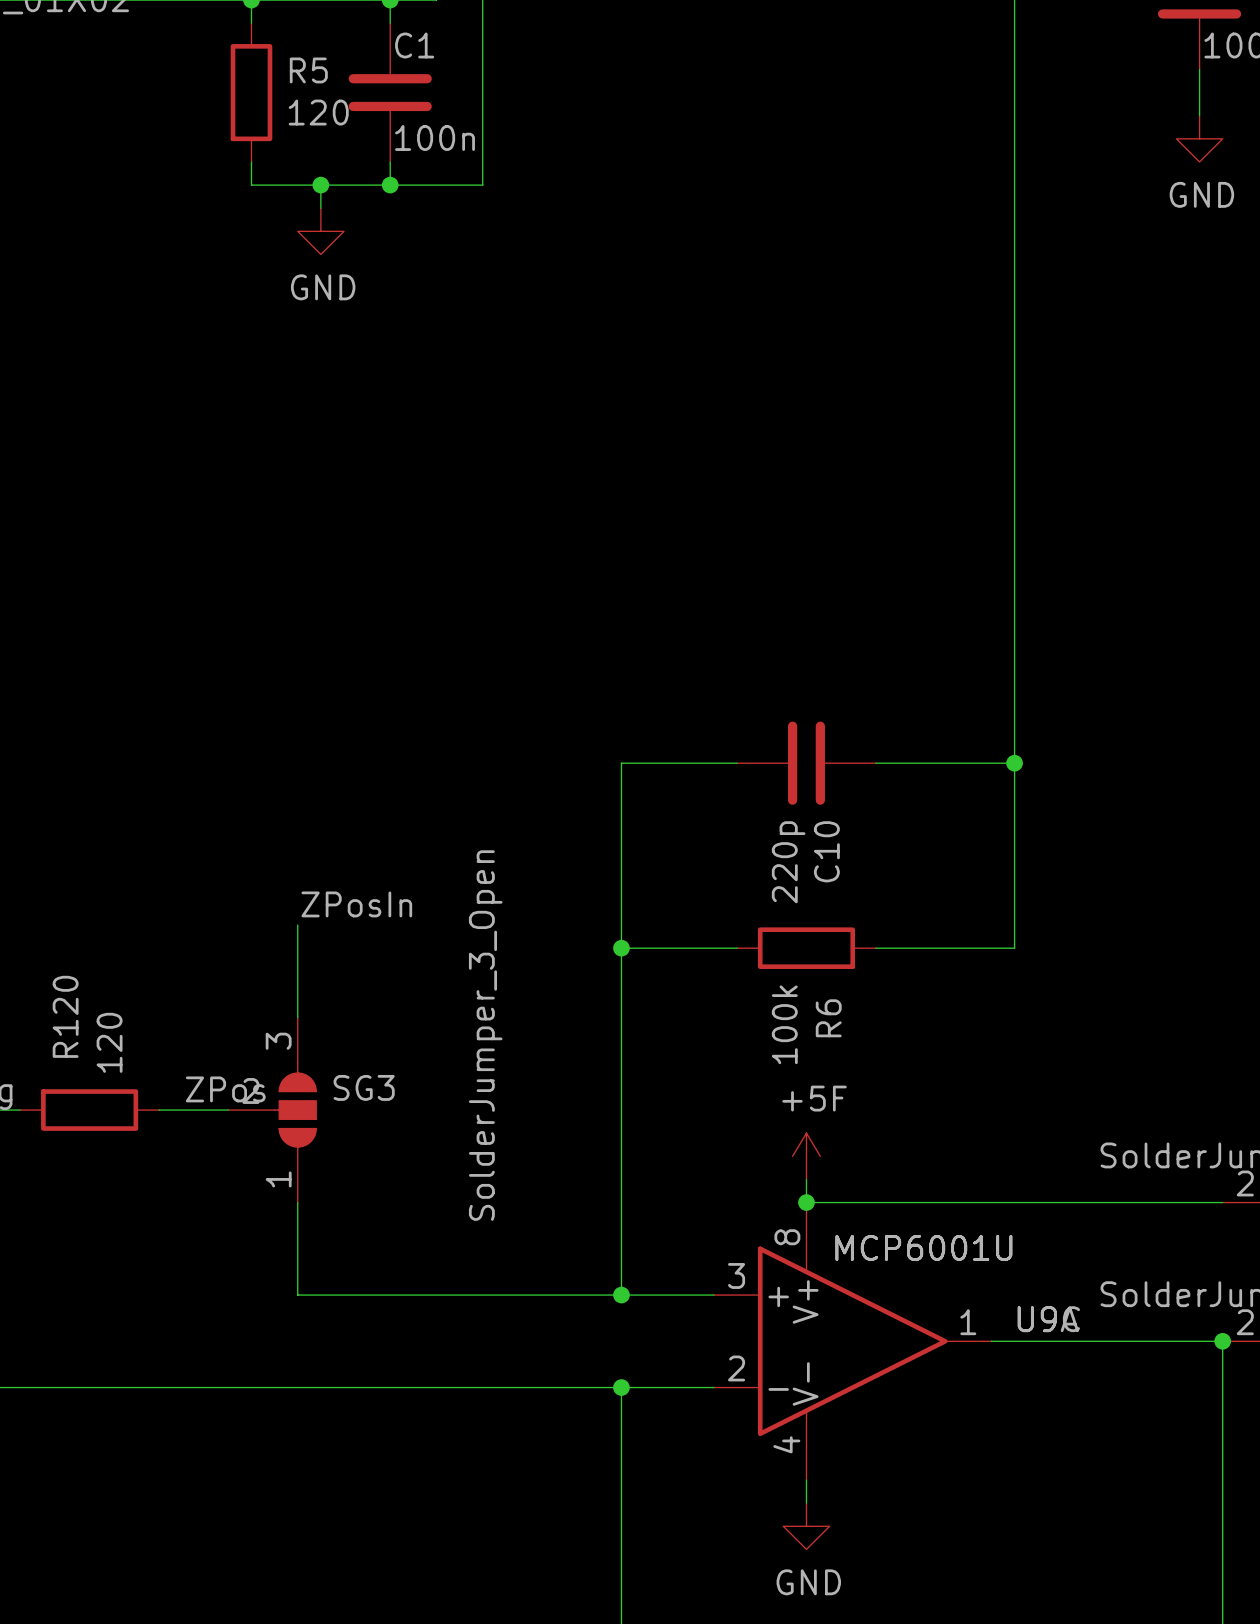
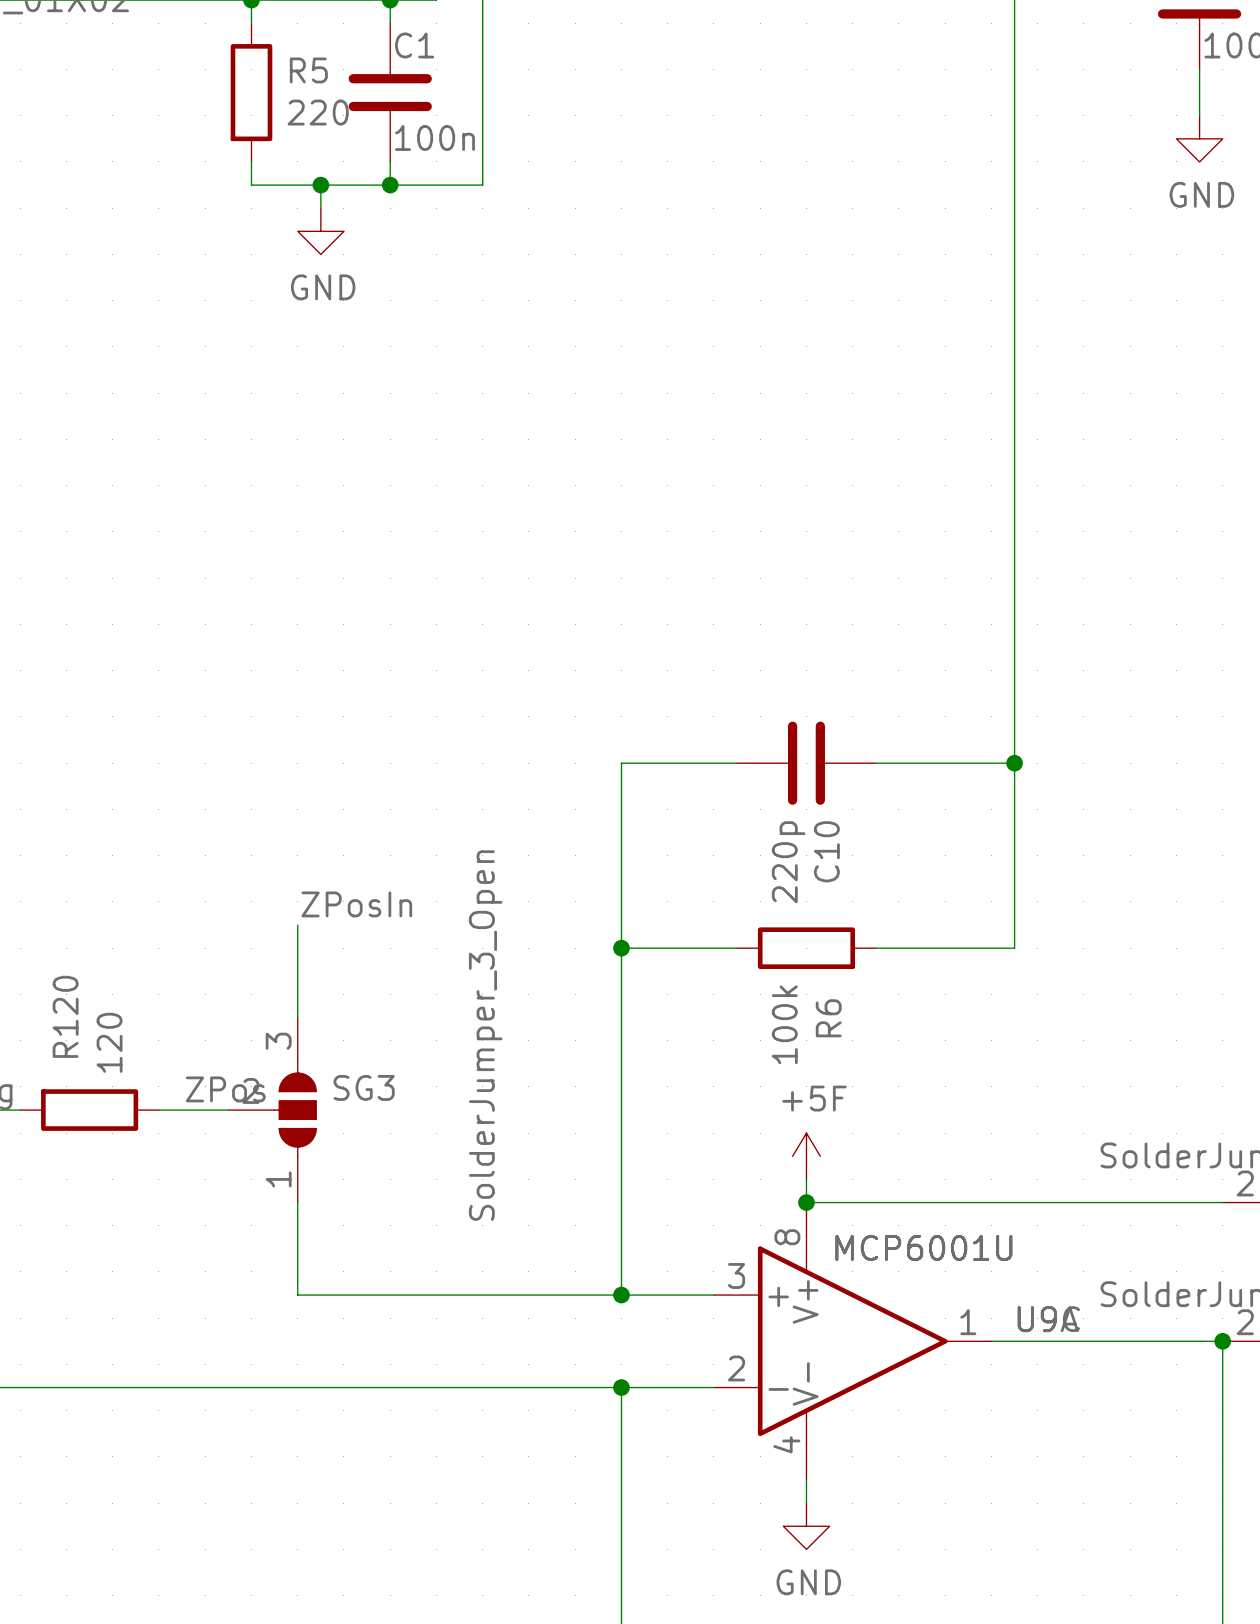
R5 value: 120 (318, 112) -> 220 (318, 112)

